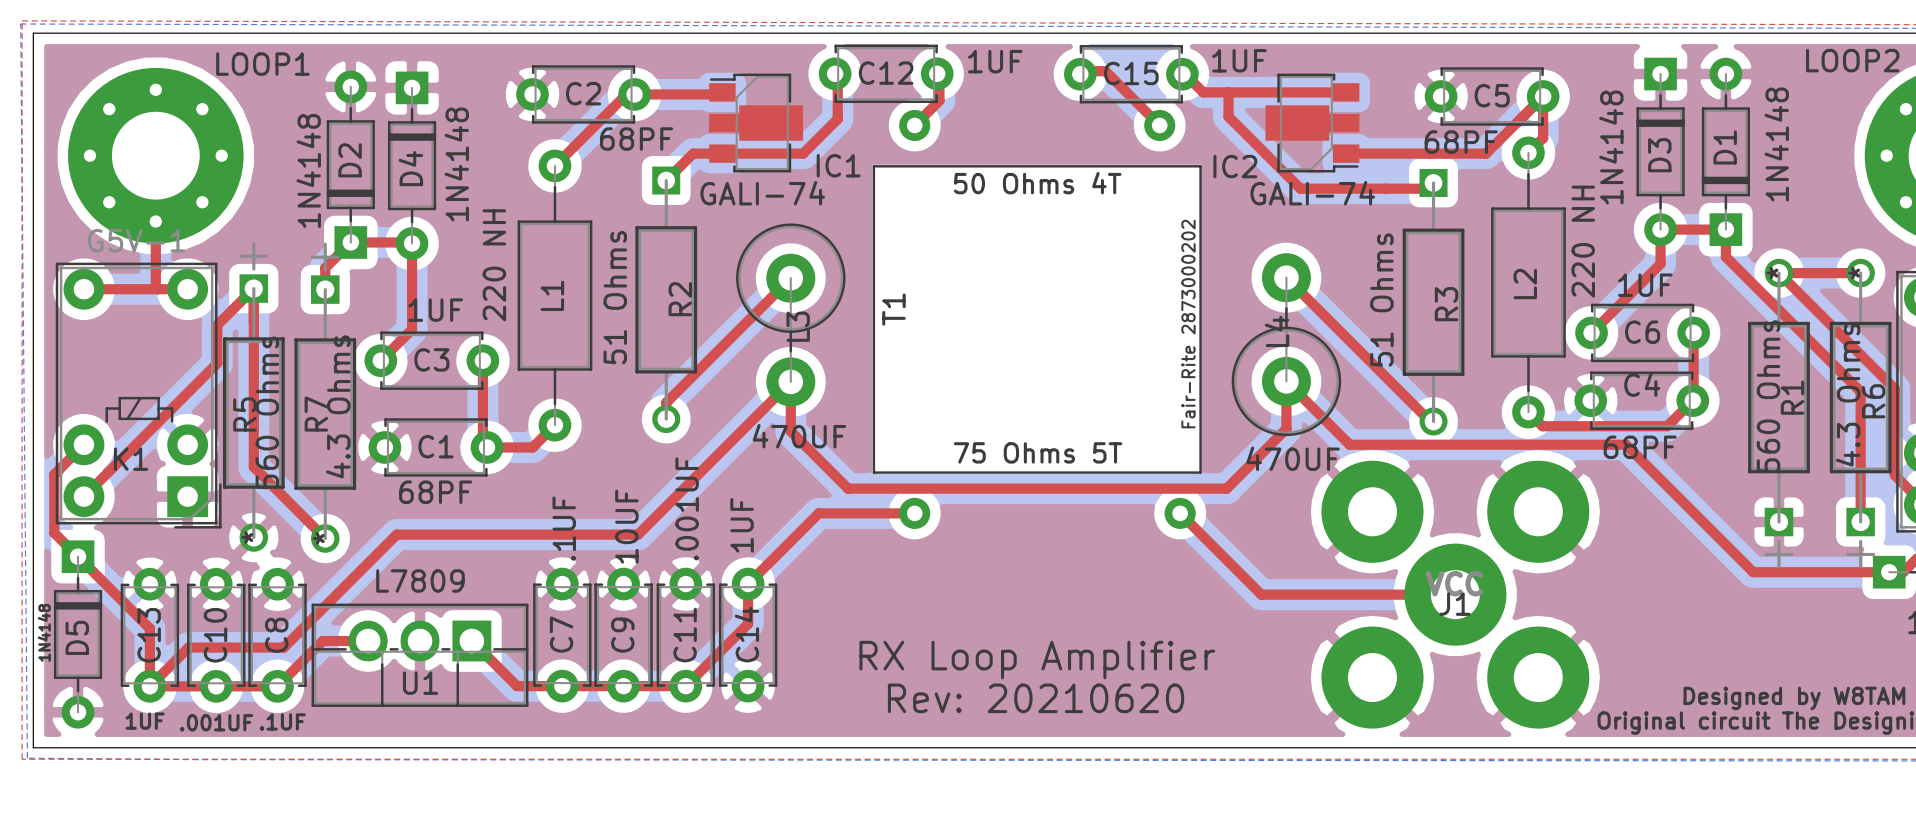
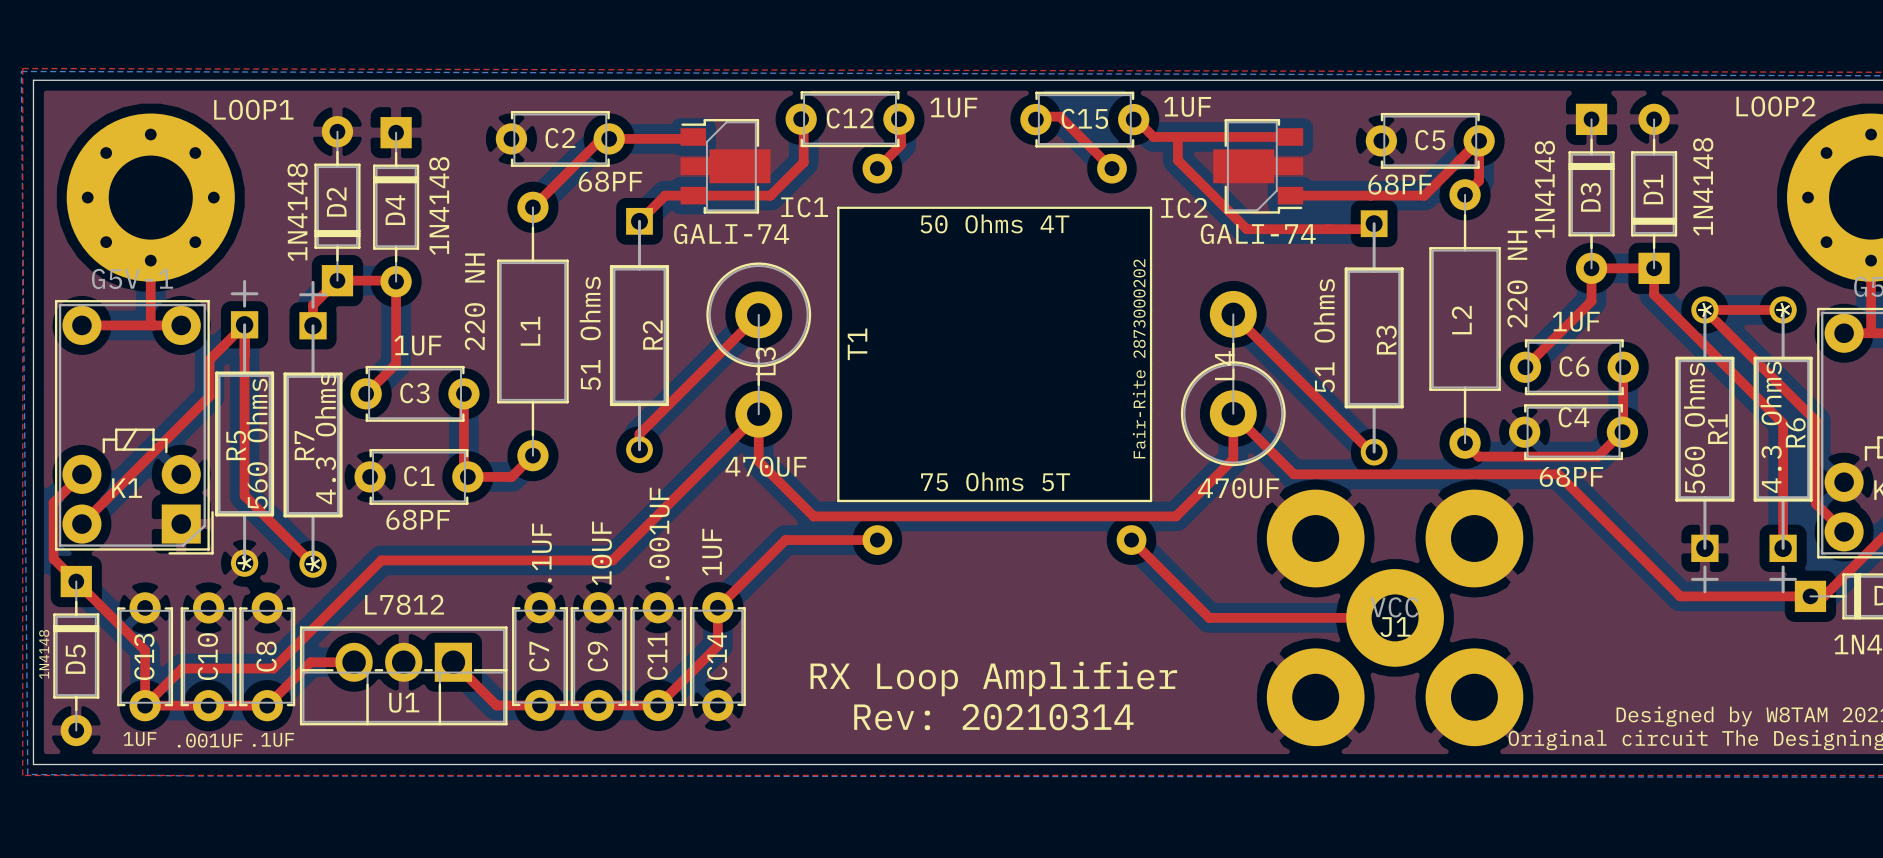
U1 value: L7809 (420, 580) -> L7812 (404, 604)
text: Rev: 20210620 (1036, 698) -> Rev: 20210314 (993, 717)

